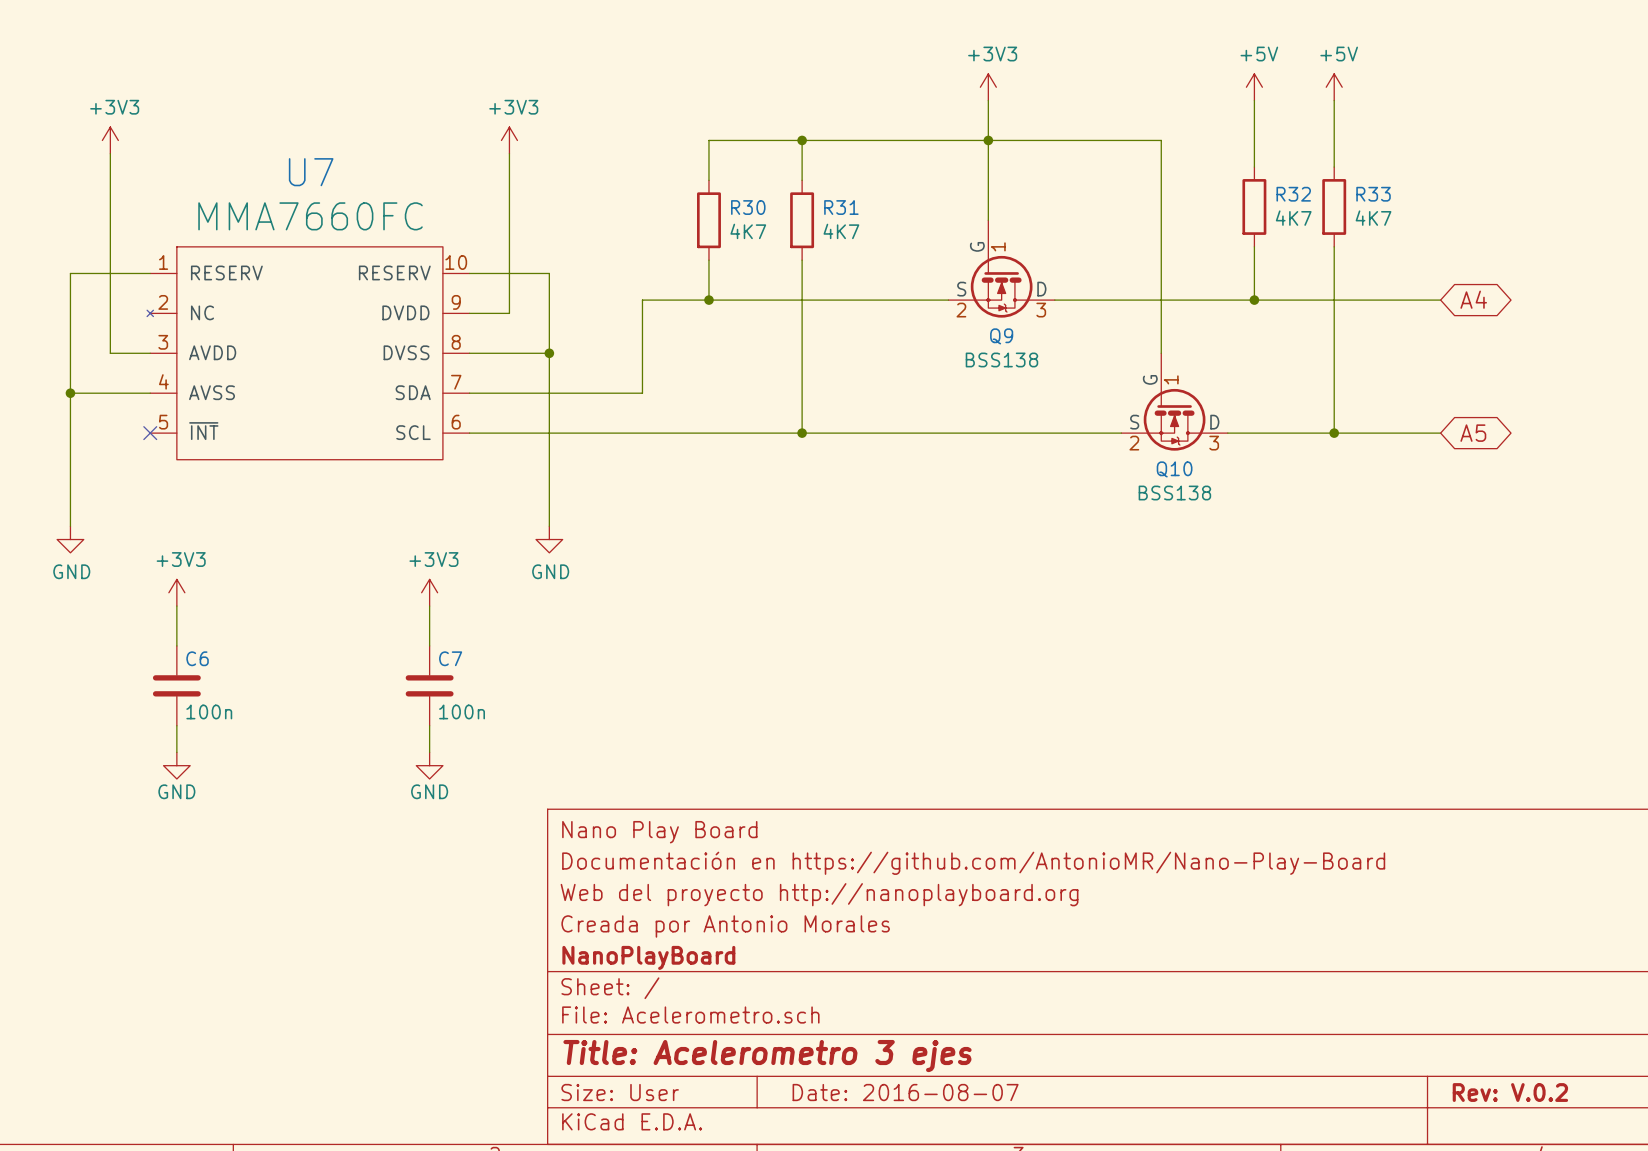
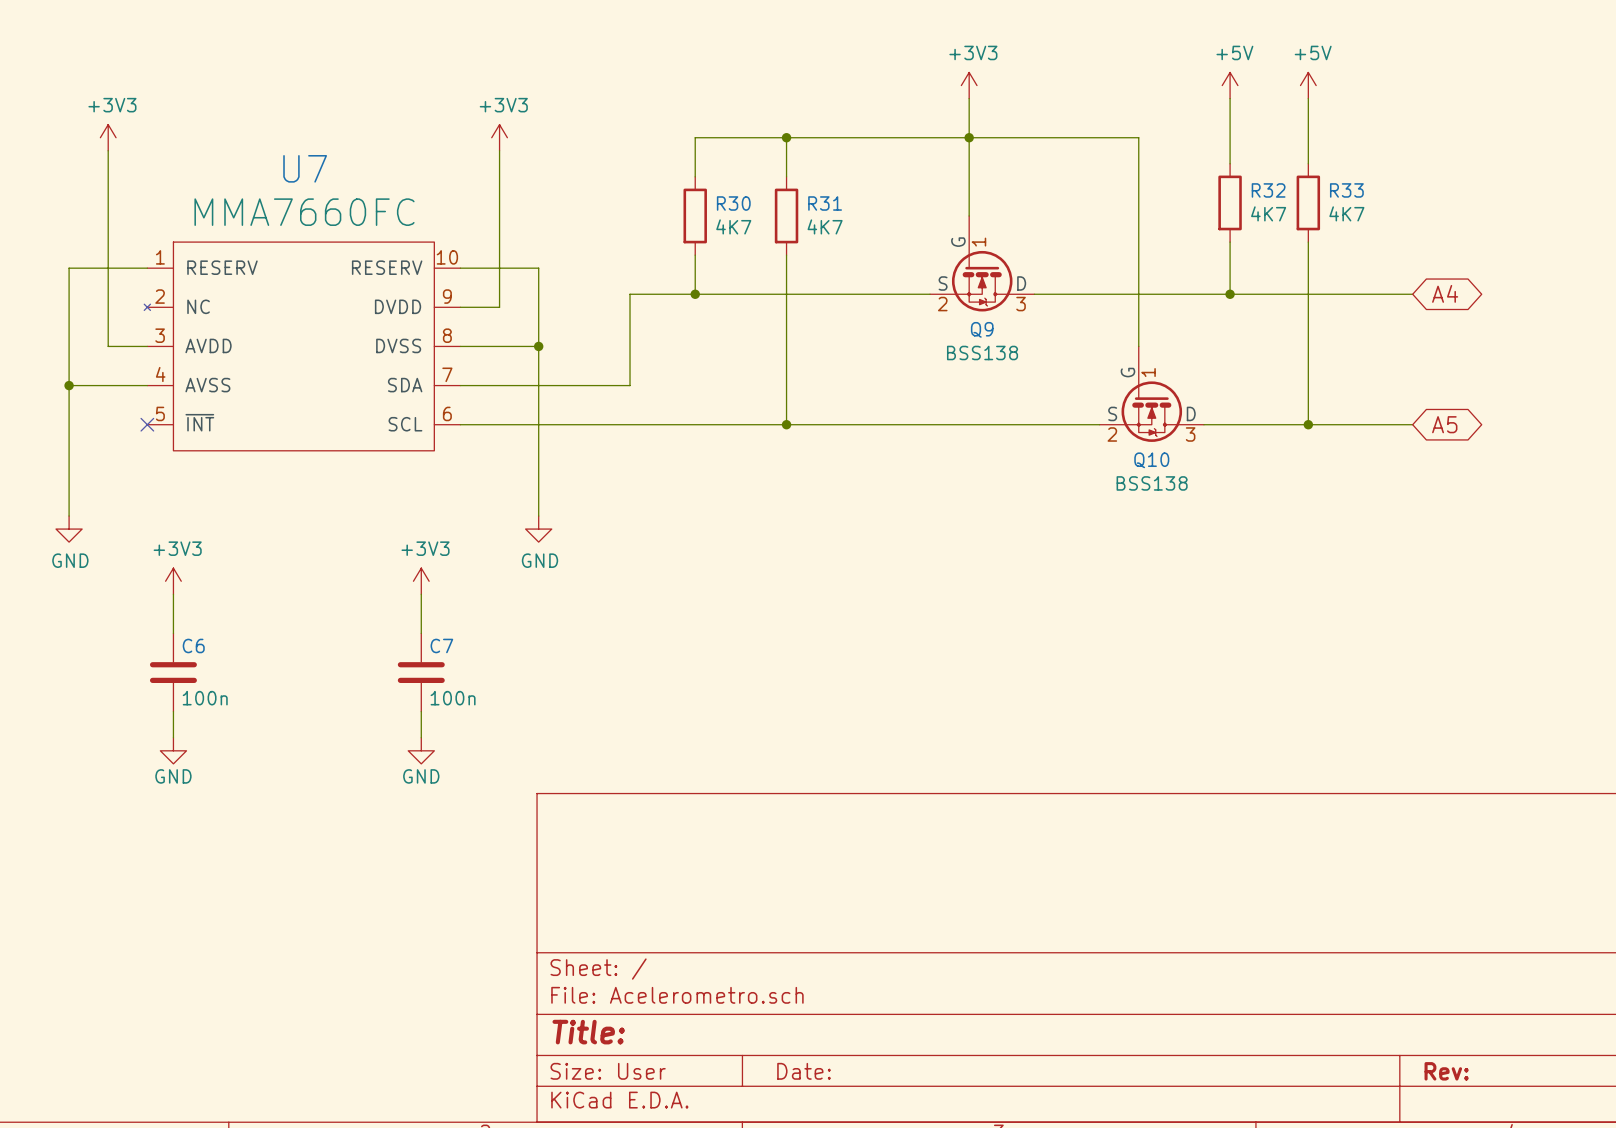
title block: Nano Play Board (659, 832) -> none
title block: Documentación en https://github.com/AntonioMR/Nano-Play-Board (973, 863) -> none
title block: Web del proyecto http://nanoplayboard.org (819, 894) -> none
title block: Creada por Antonio Morales (725, 926) -> none
title block: NanoPlayBoard (648, 957) -> none
title block: Title: Acelerometro 3 ejes (767, 1056) -> Title: (588, 1032)
title block: Date: 2016-08-07 (905, 1092) -> Date: (804, 1071)
title block: Rev: V.0.2 (1510, 1092) -> Rev: (1446, 1071)

